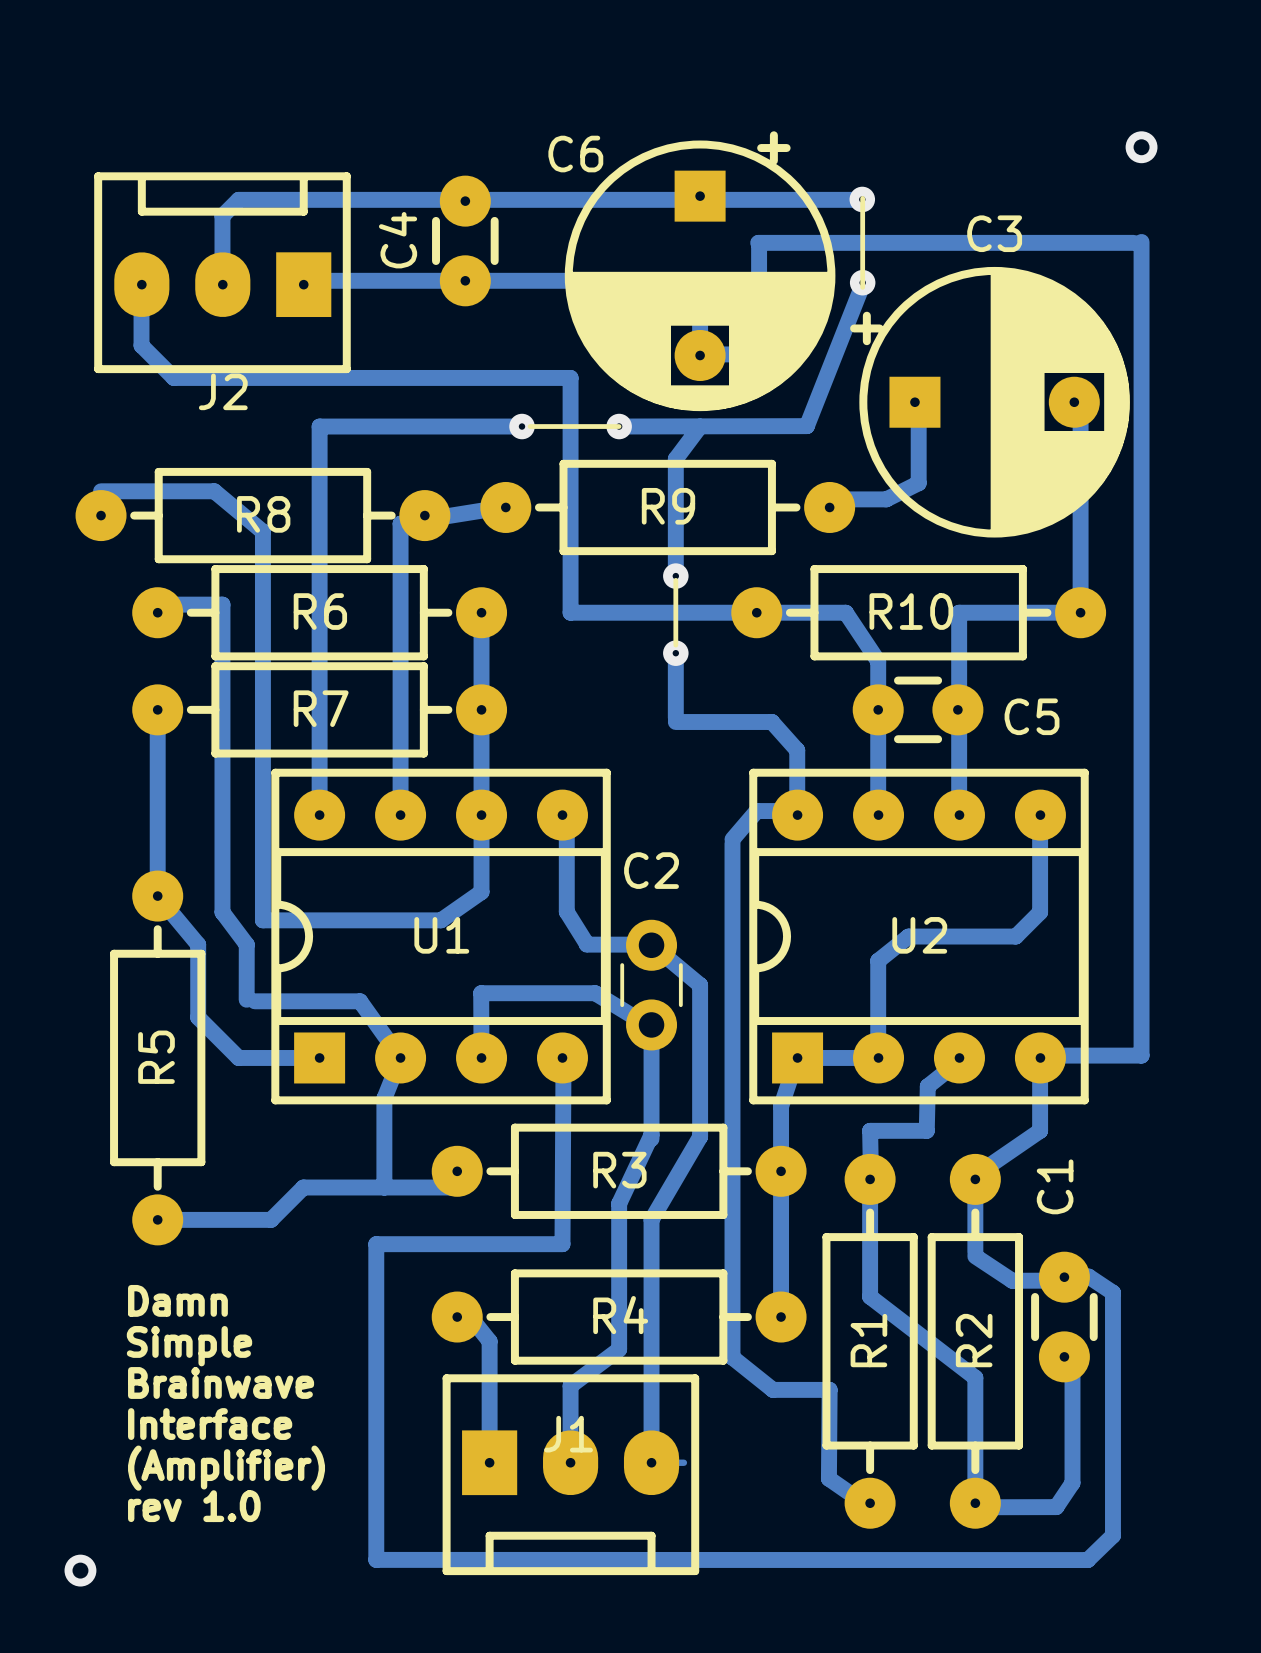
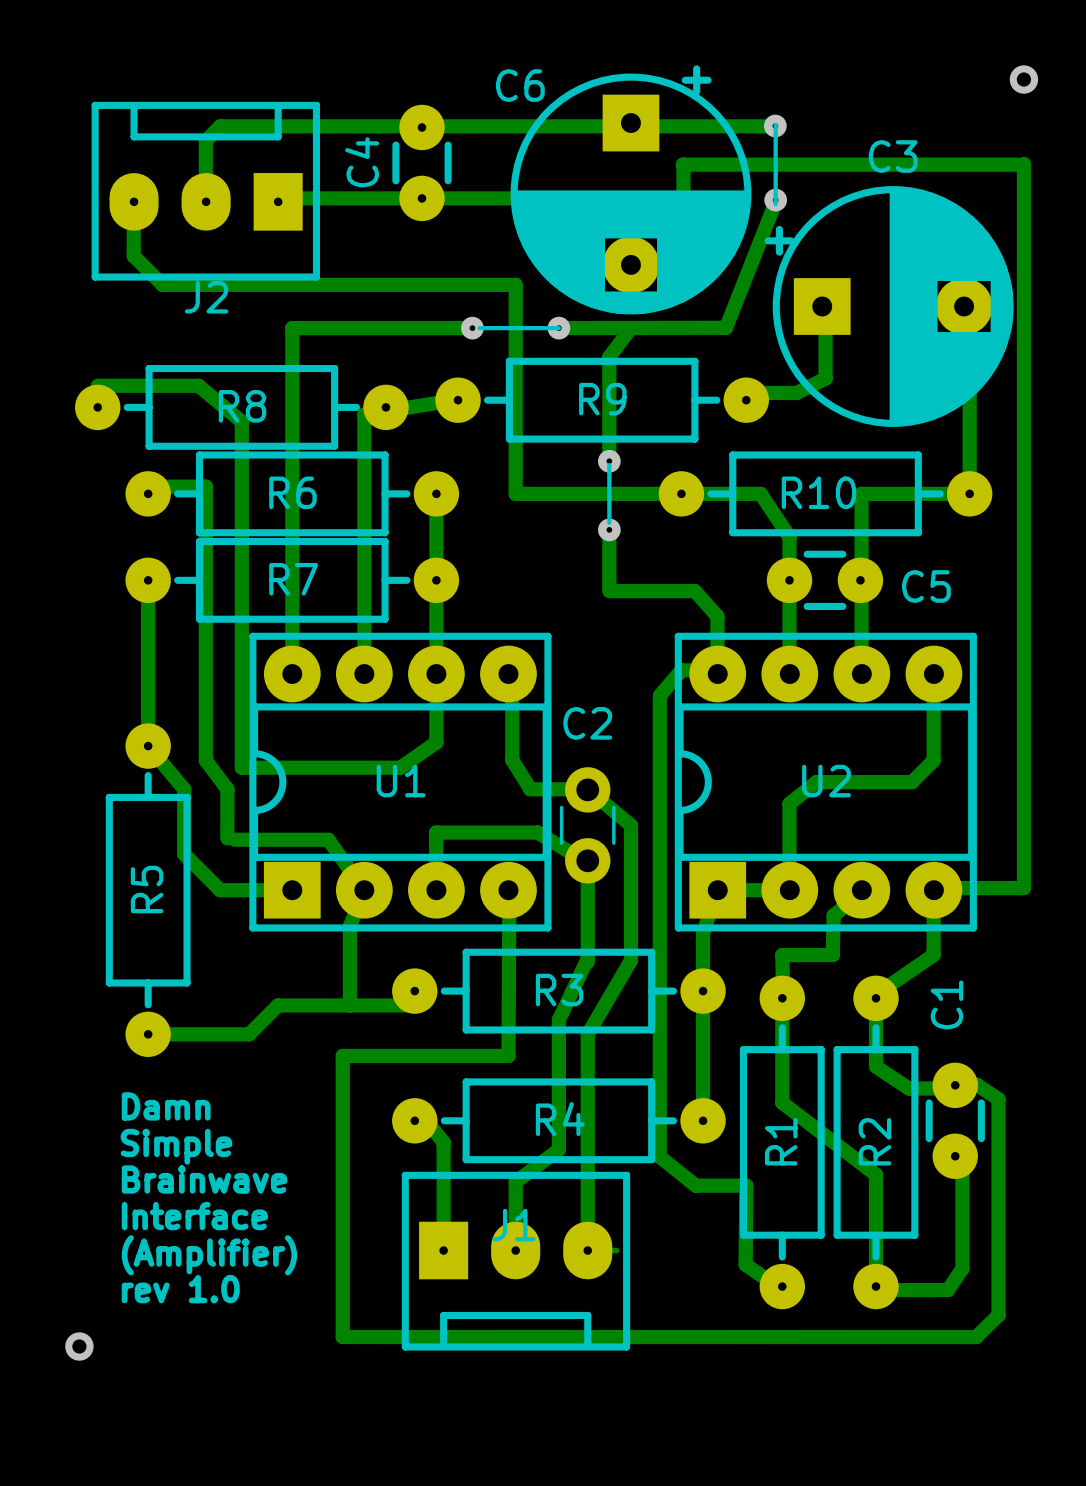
C6 footprint: [564, 131, 836, 412] -> [510, 65, 752, 315]
C3 footprint: [850, 266, 1130, 538] -> [764, 186, 1014, 427]
U1 footprint: [271, 768, 611, 1105] -> [249, 632, 552, 932]
U2 footprint: [749, 768, 1089, 1105] -> [674, 632, 977, 932]

